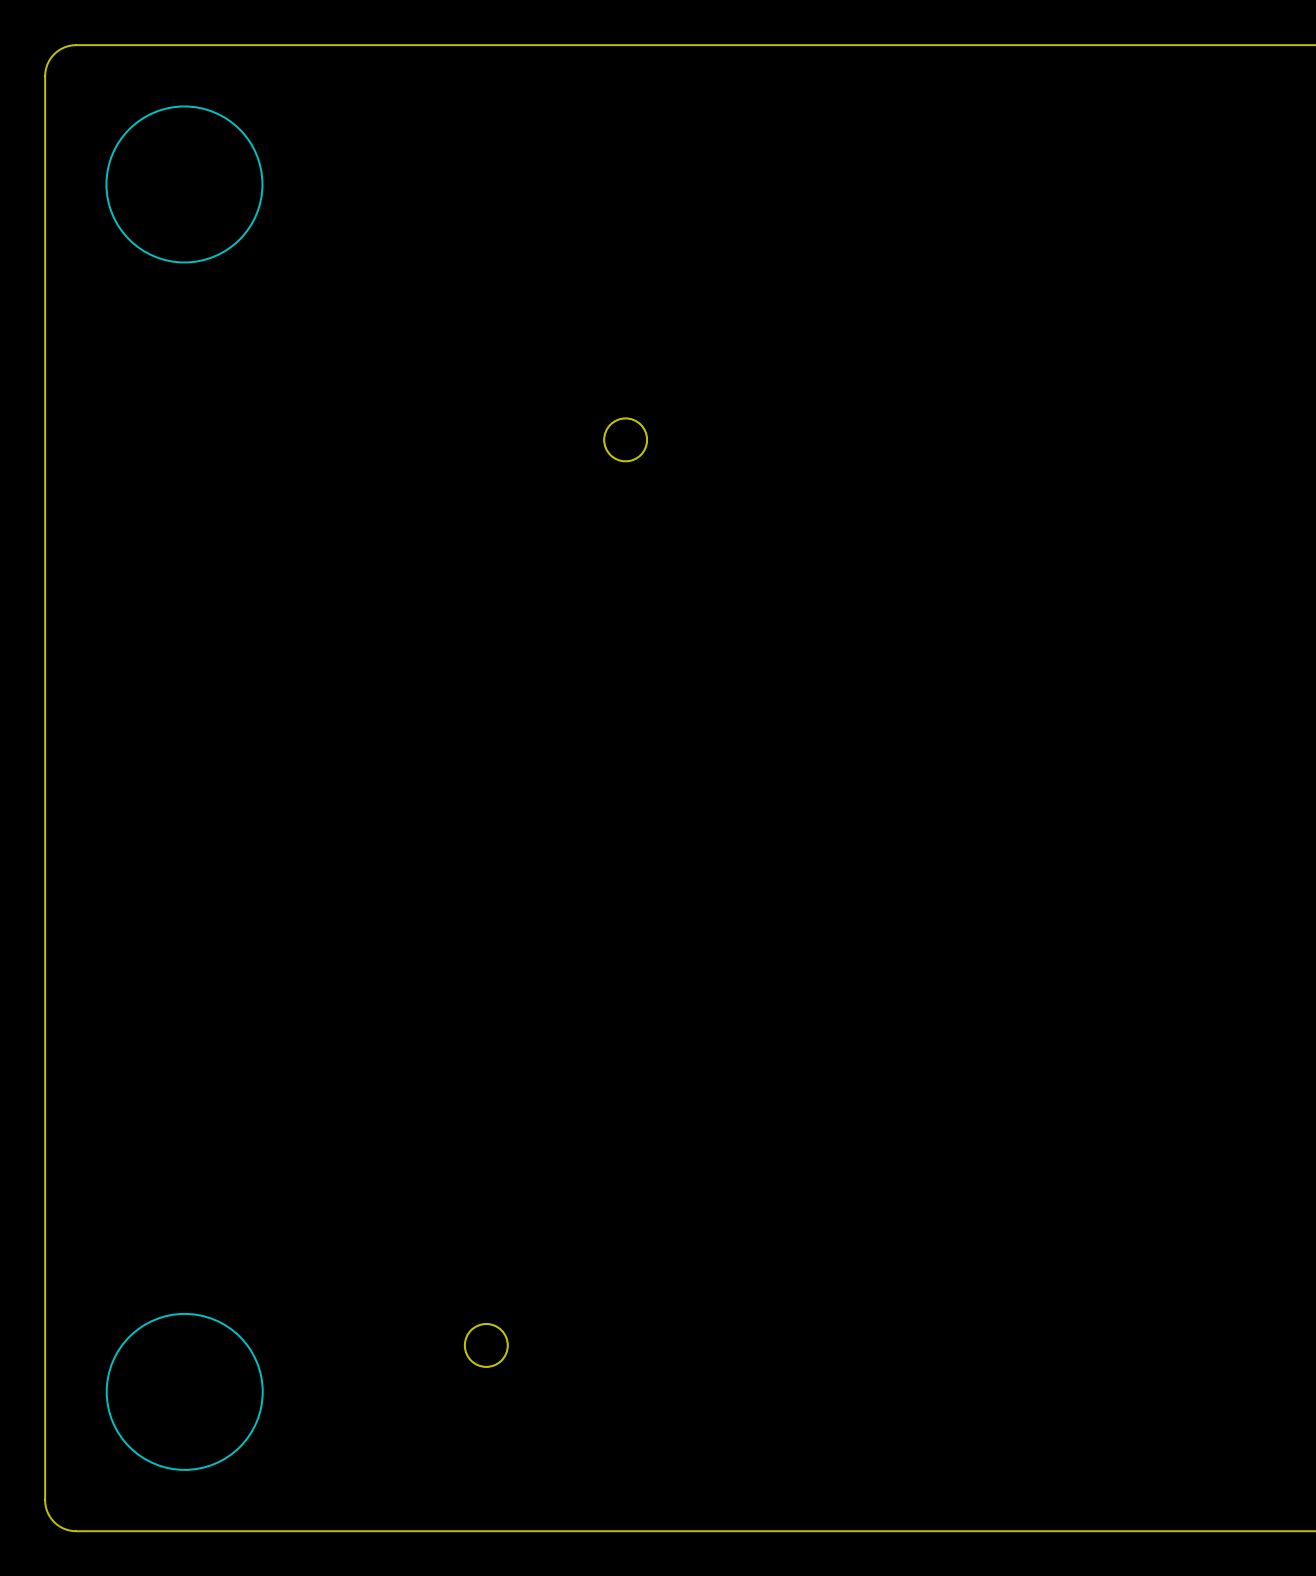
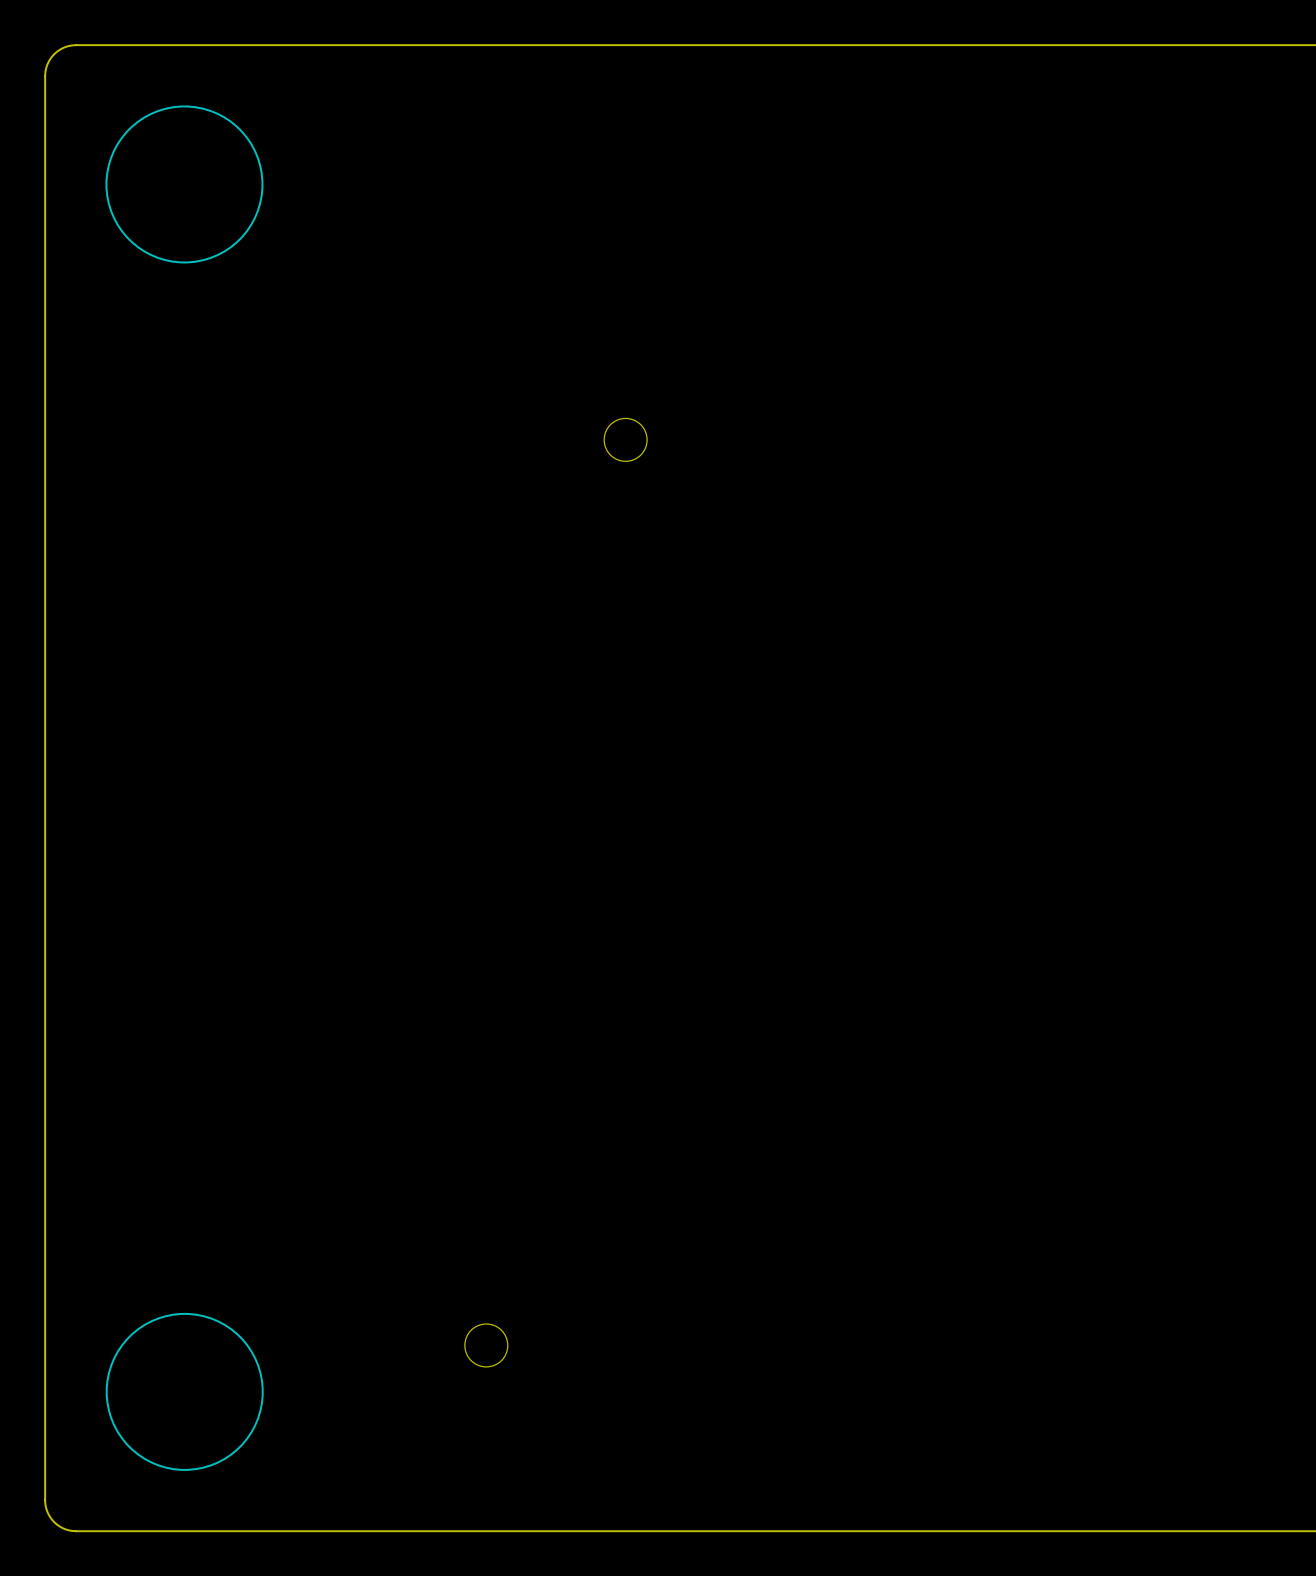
round board edge: [603, 417, 649, 463] -> none
round board edge: [463, 1323, 509, 1368] -> none

